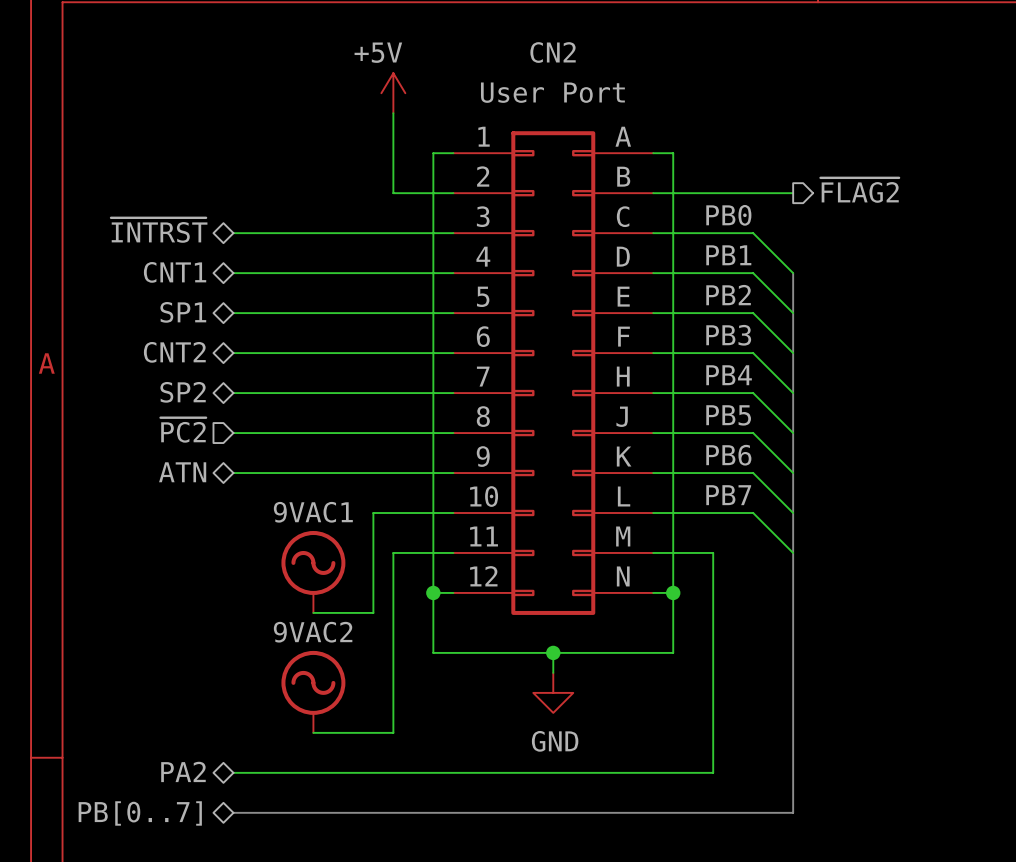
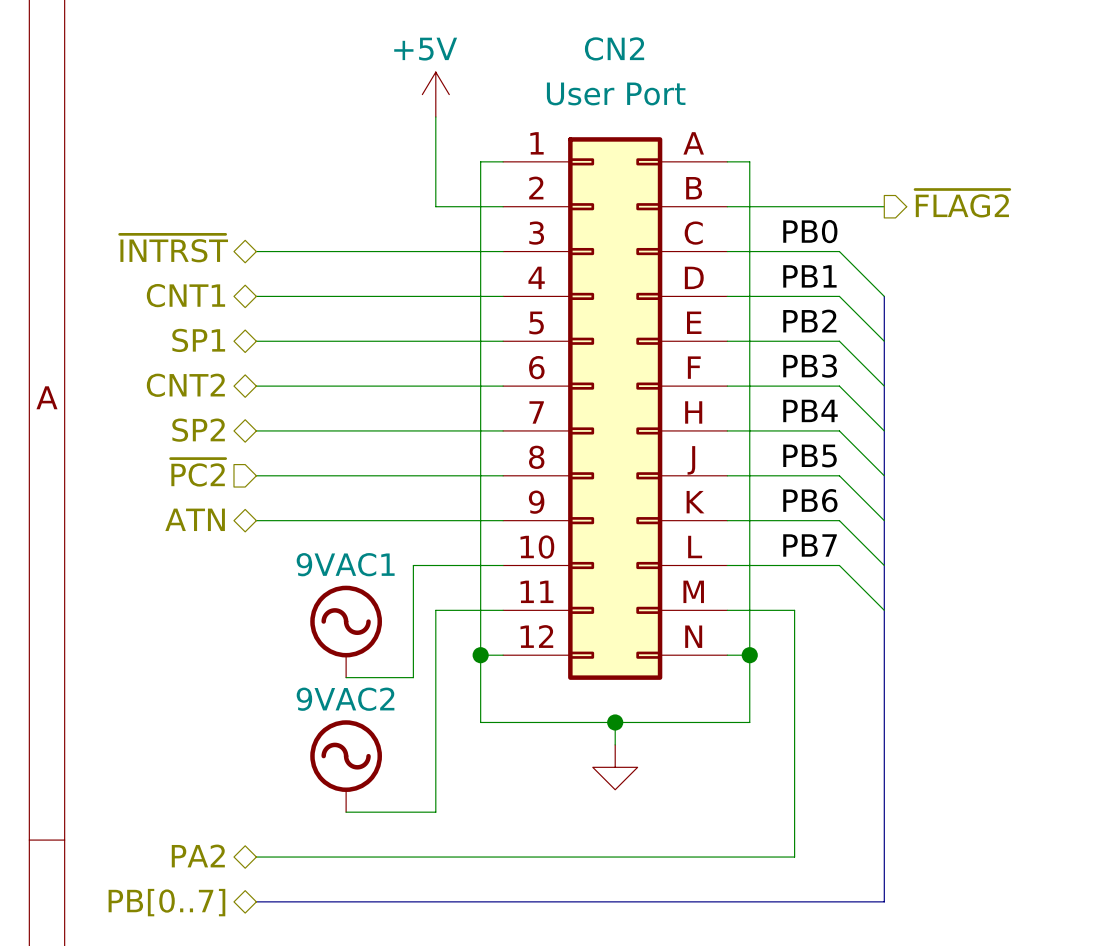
power symbol text: GND (555, 741) -> none

